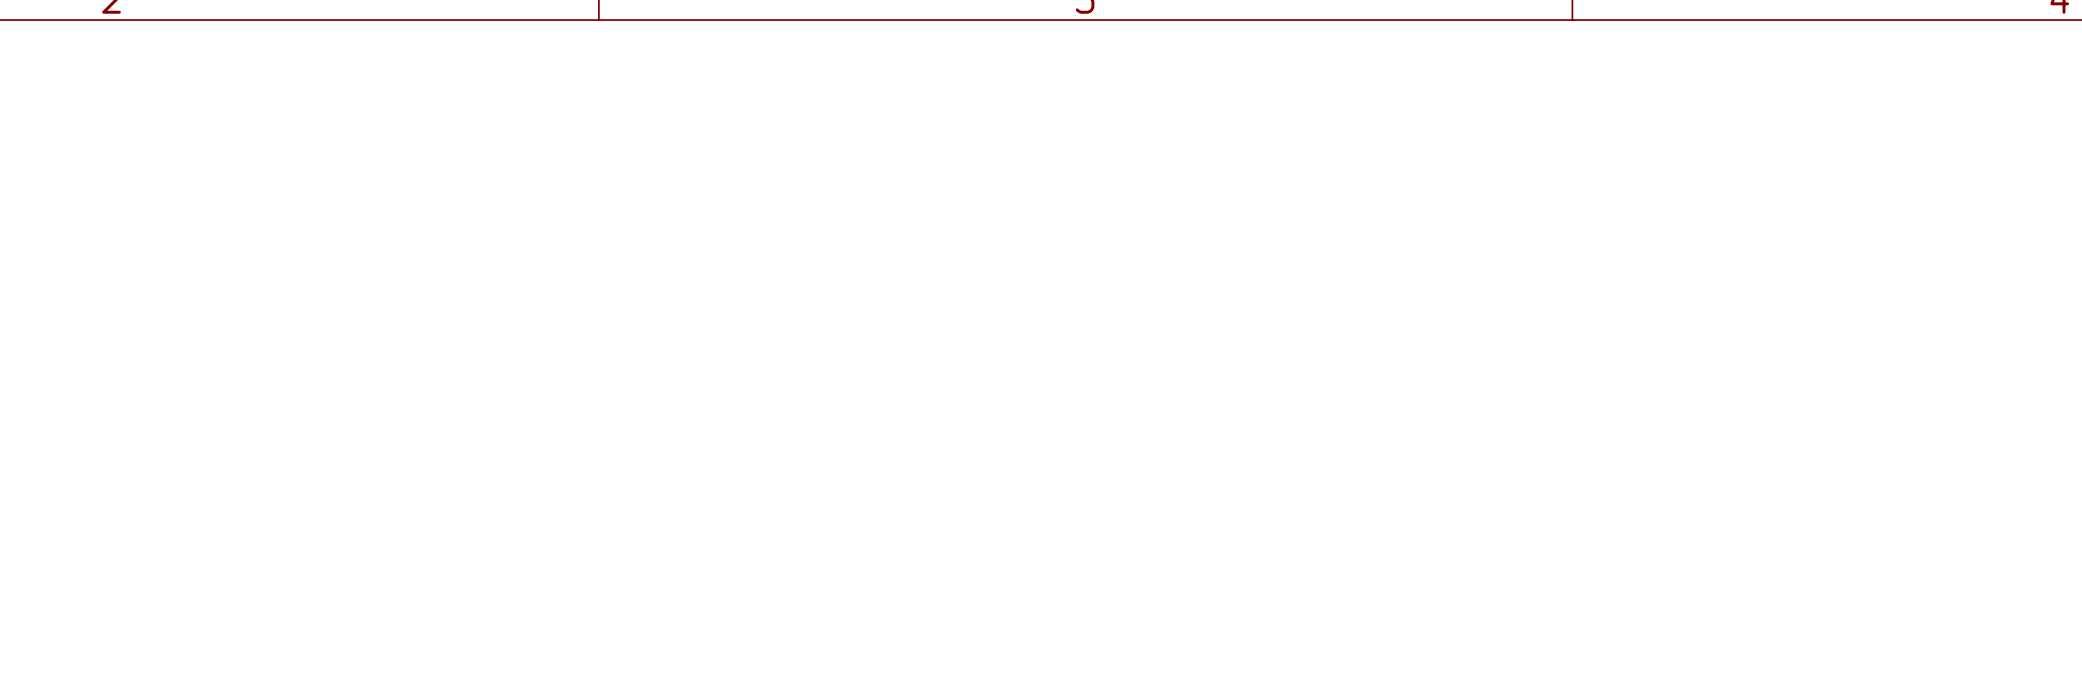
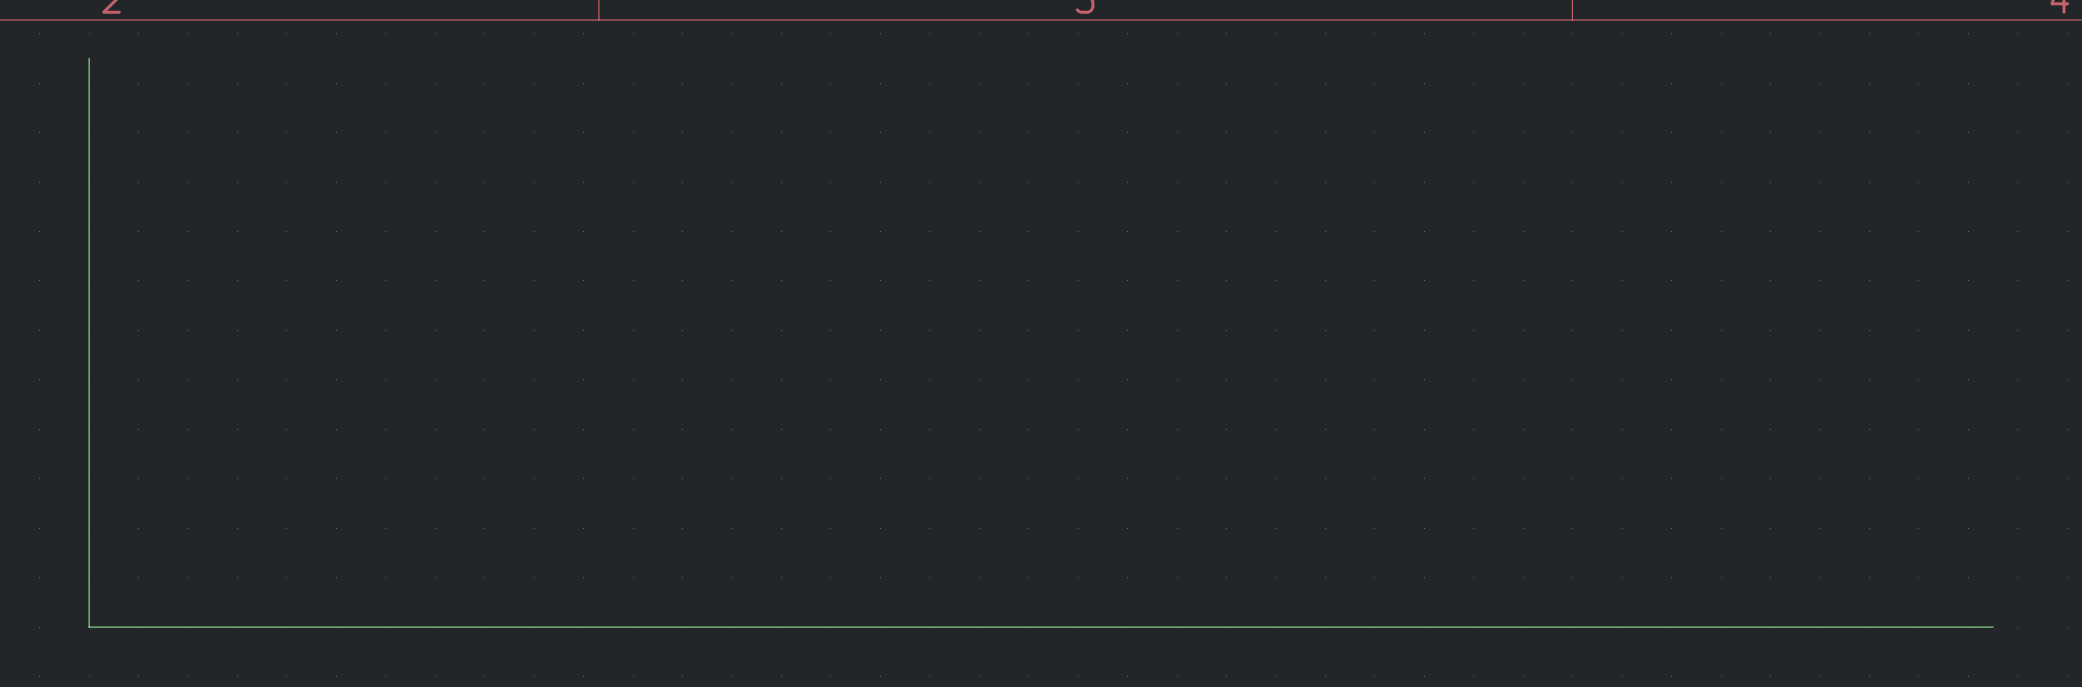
wire: none -> (89, 58) (89, 627) (1993, 627)

